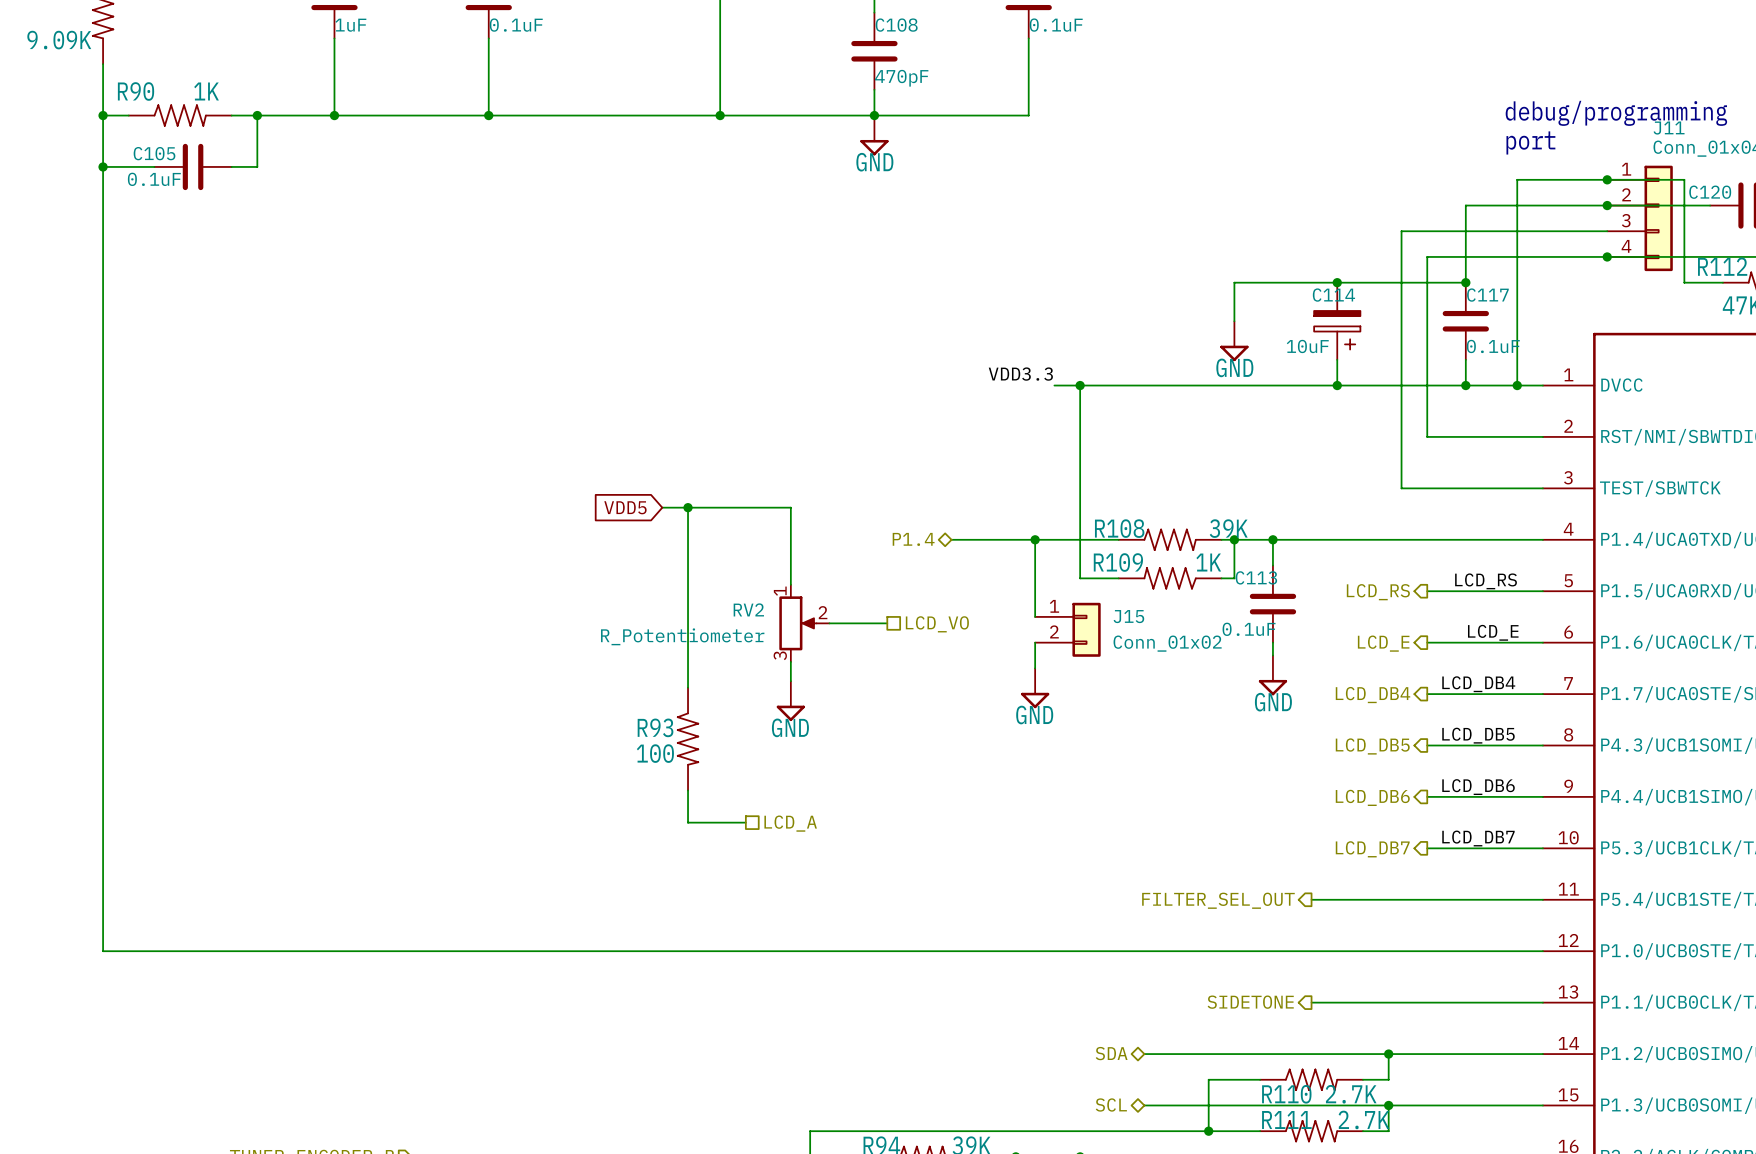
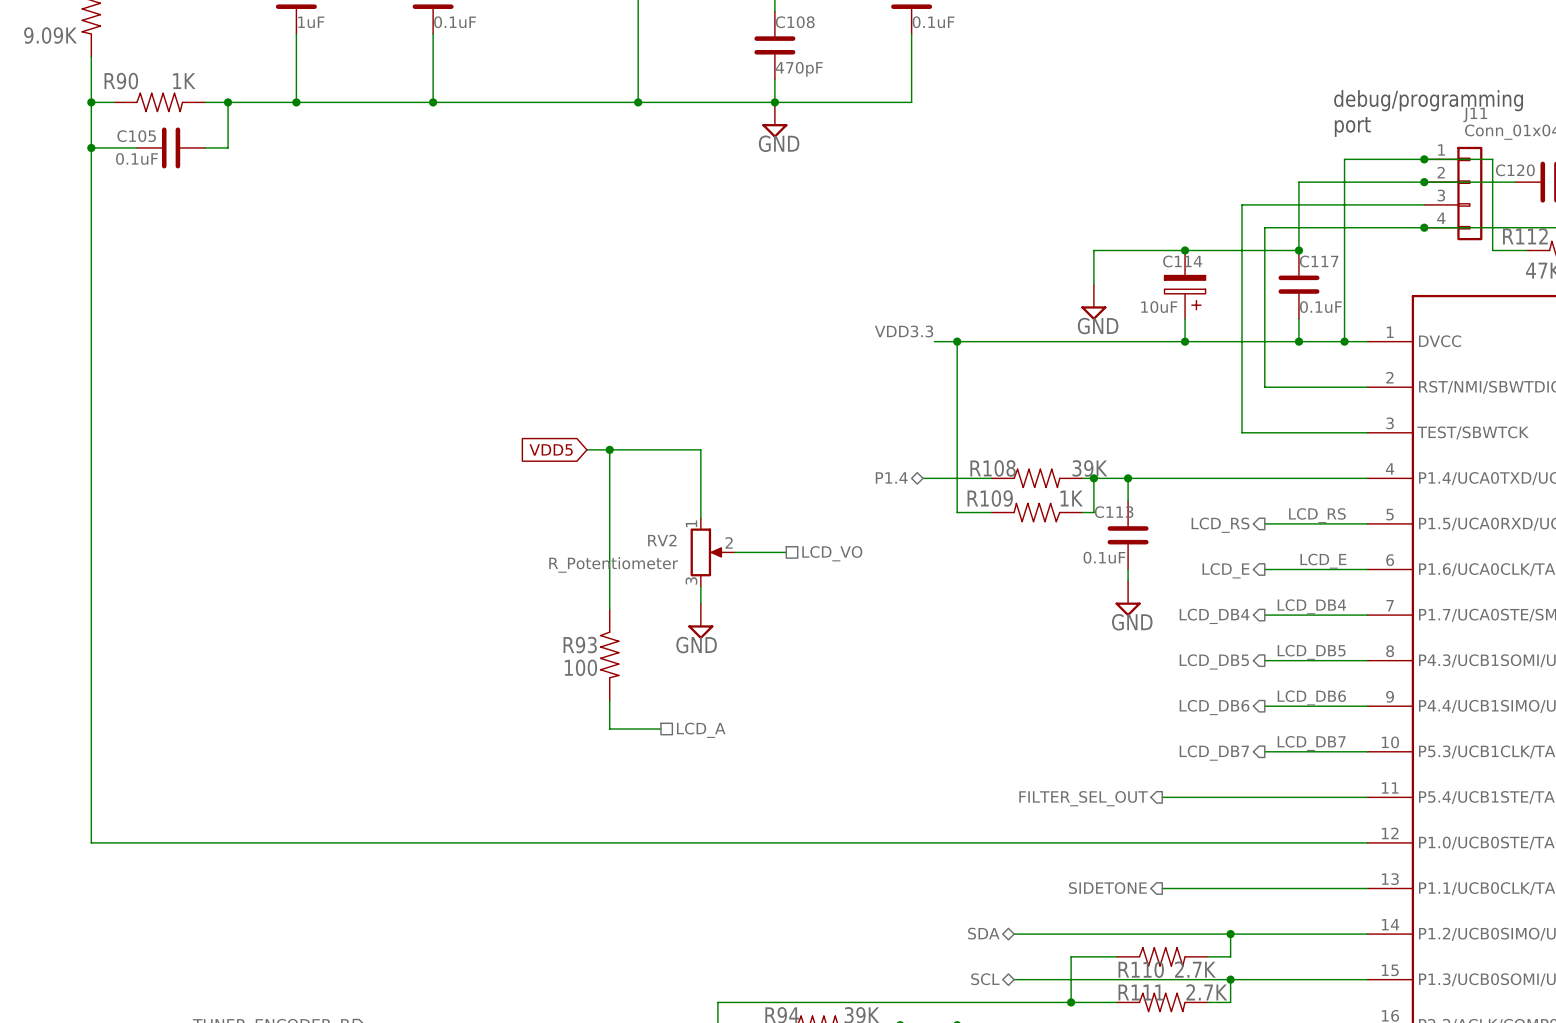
hierarchical label position: P1.4 (913, 539) -> P1.4 (891, 477)
wire: (951, 539) (1041, 539) -> none
wire: (1035, 539) (1035, 616) -> none
junction: (1035, 539) -> none
J15: Conn_01x02 (1067, 629) -> none
wire: (1035, 642) (1035, 668) -> none
power symbol: GND (1035, 688) -> none

